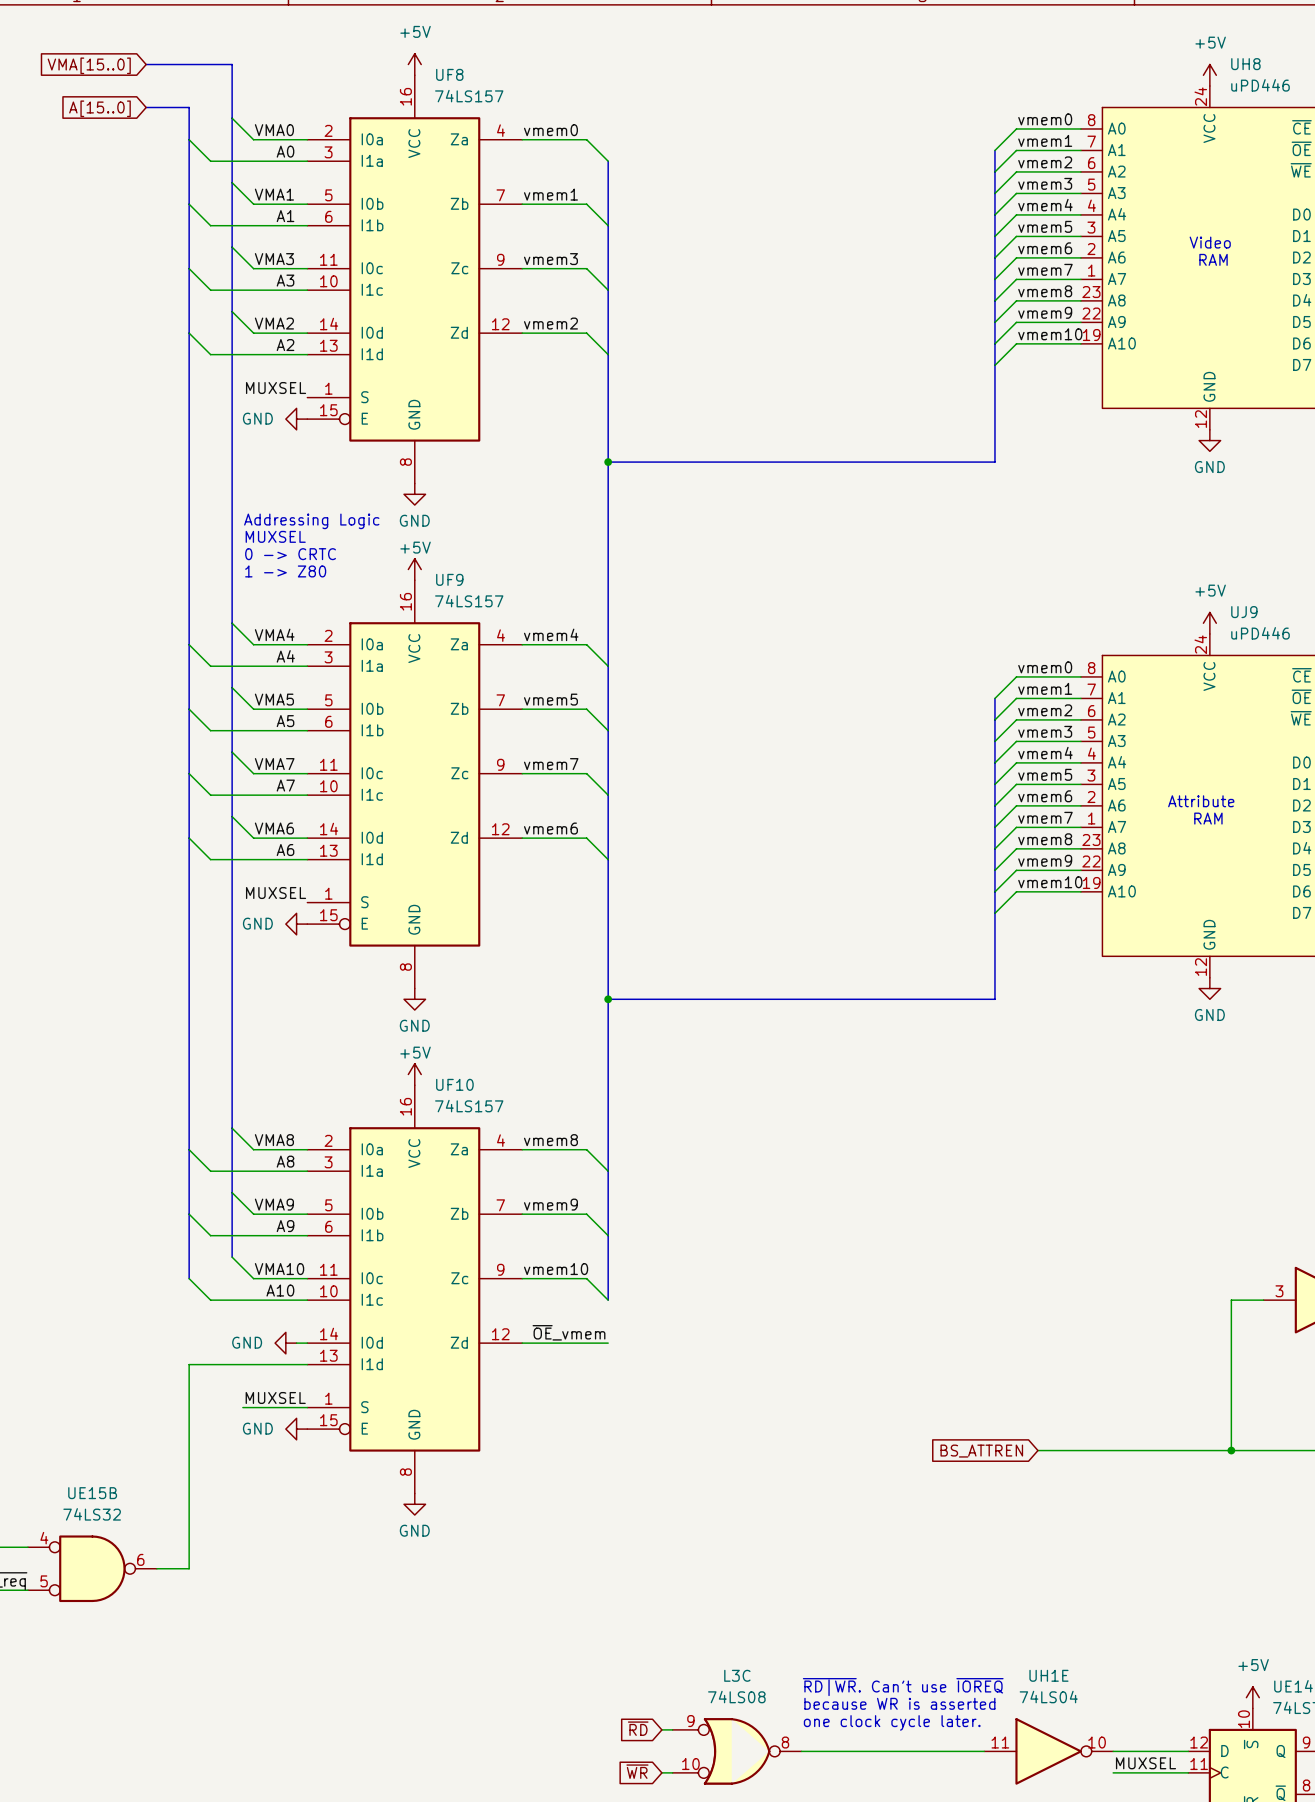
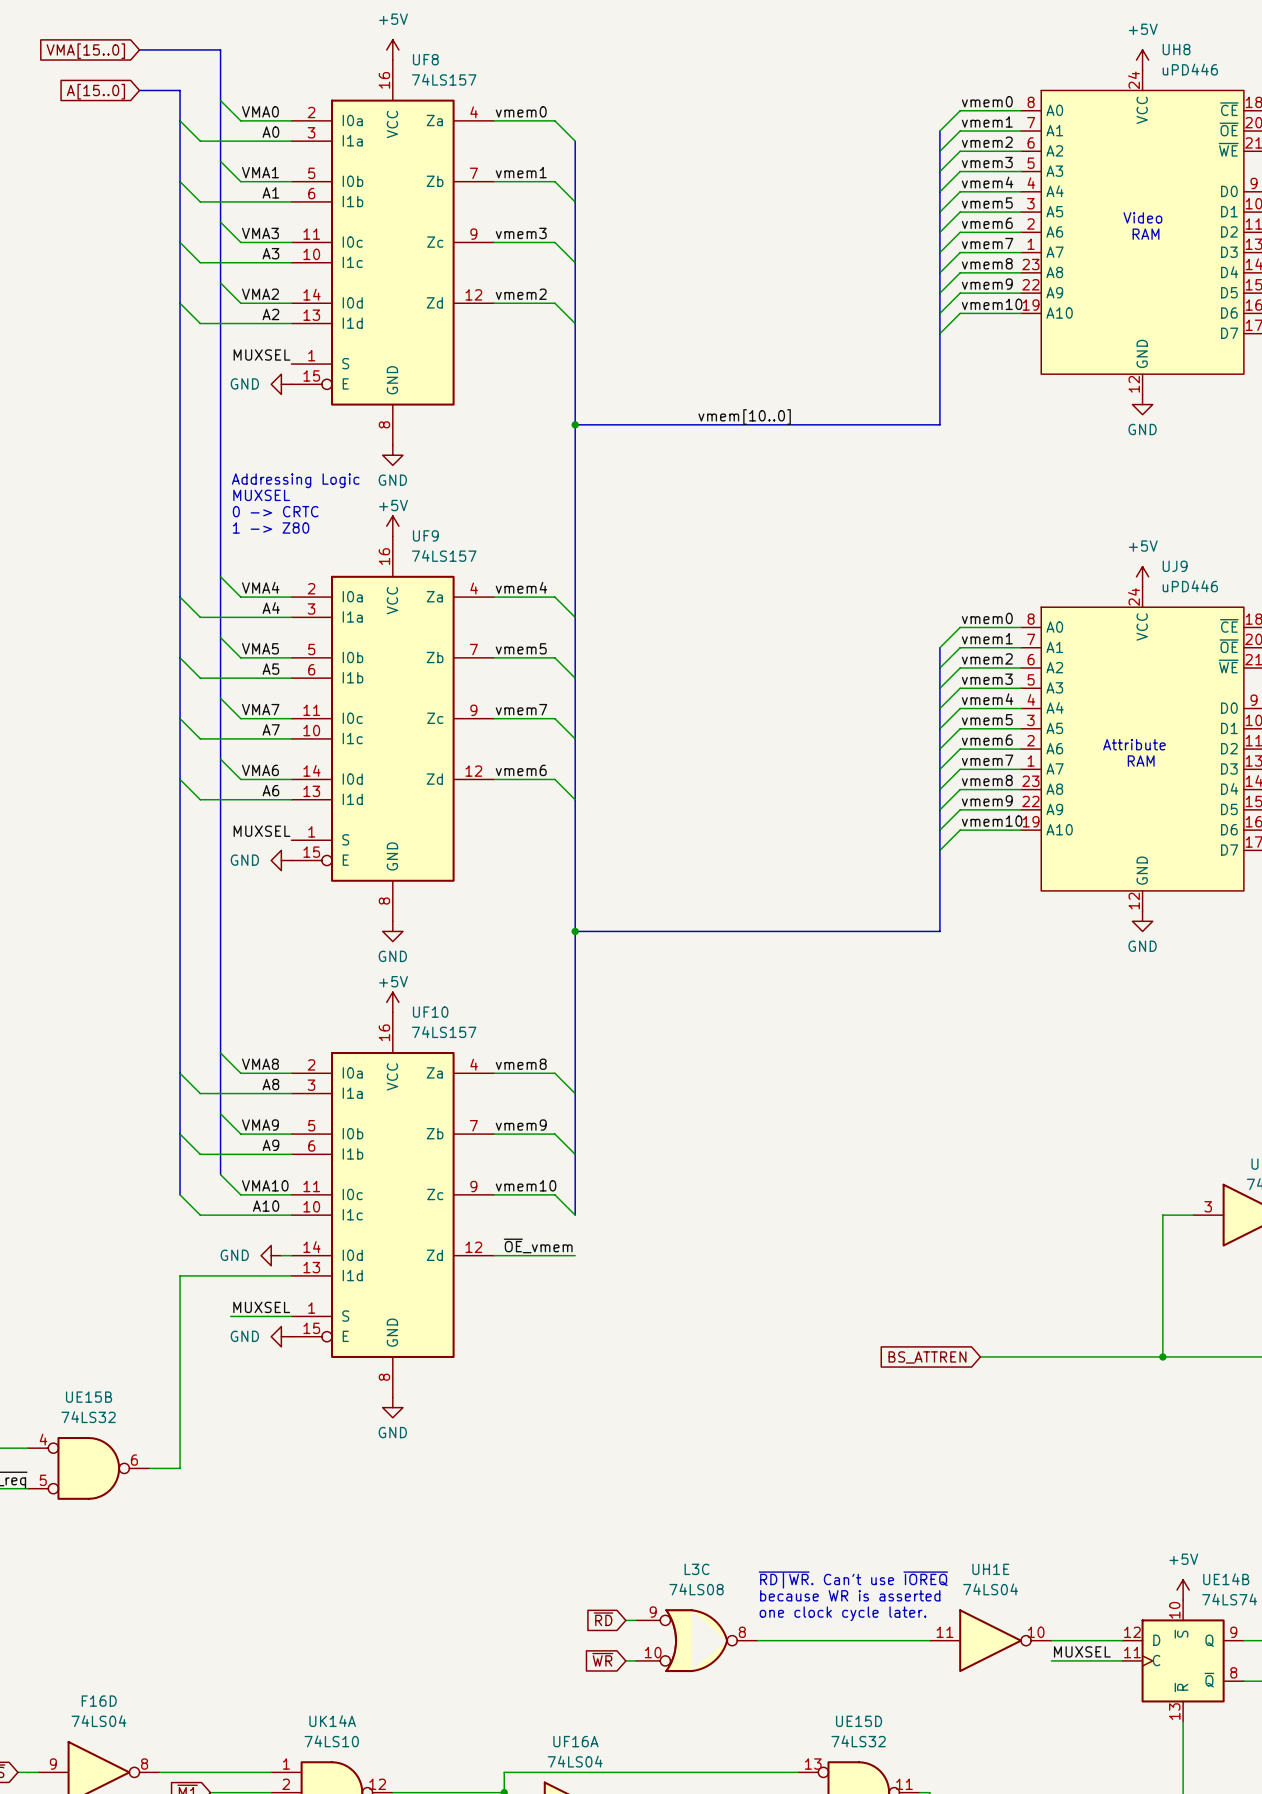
label: none -> vmem[10..0] (744, 417)

